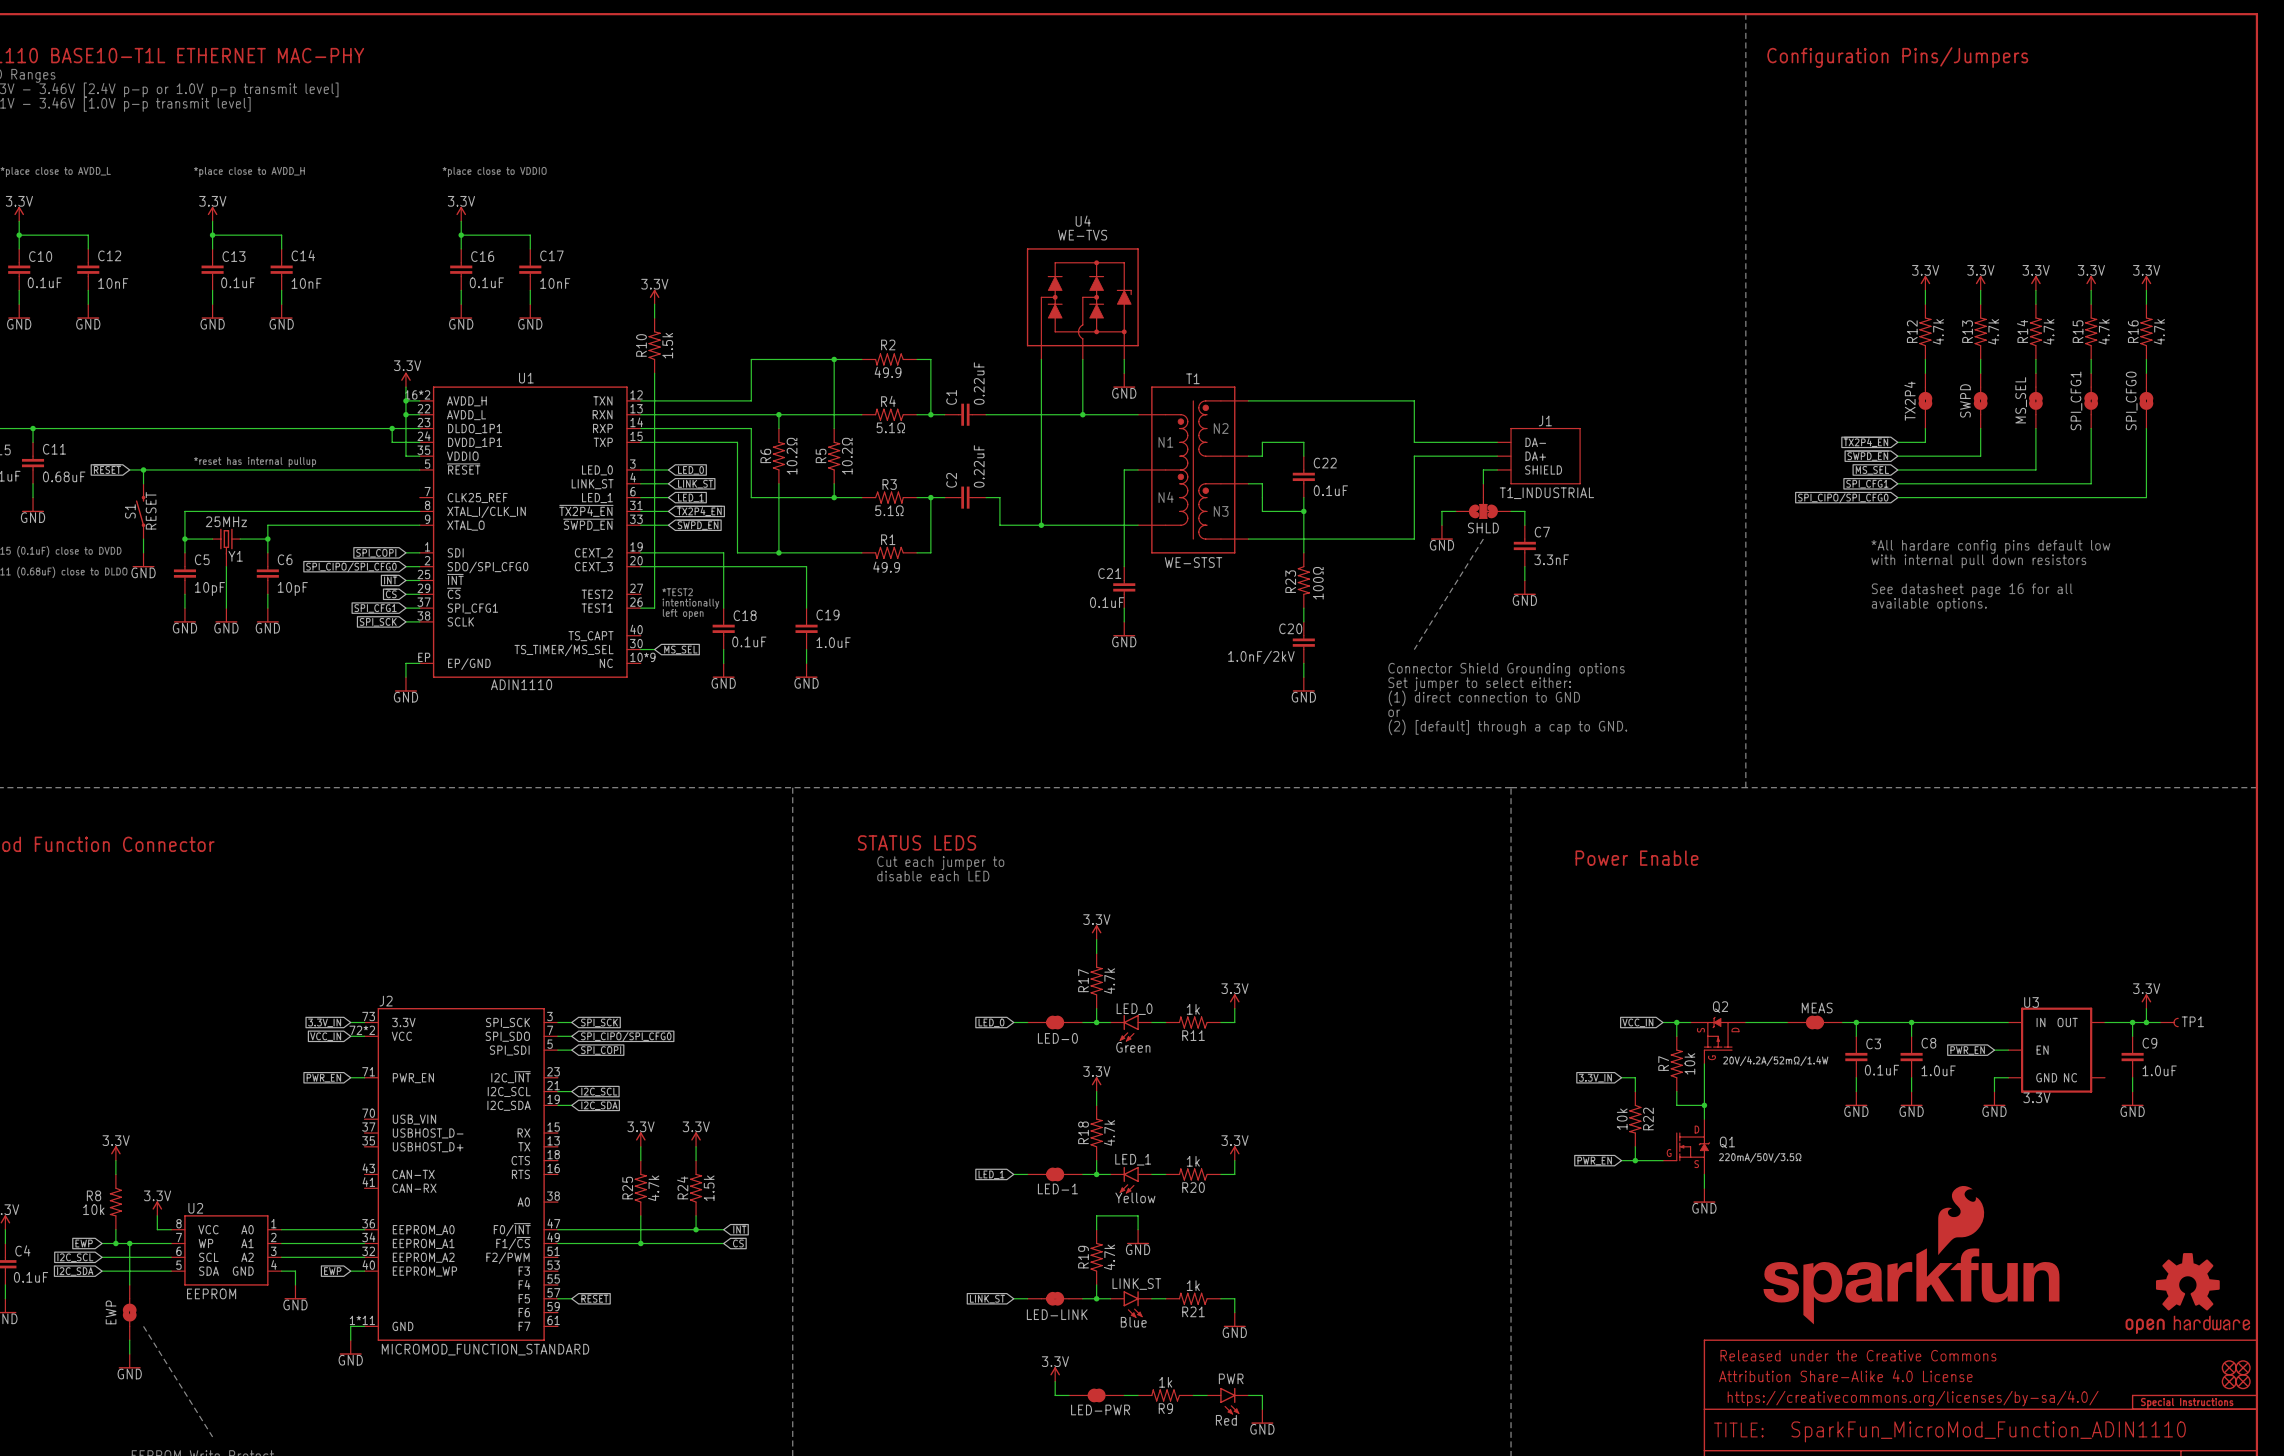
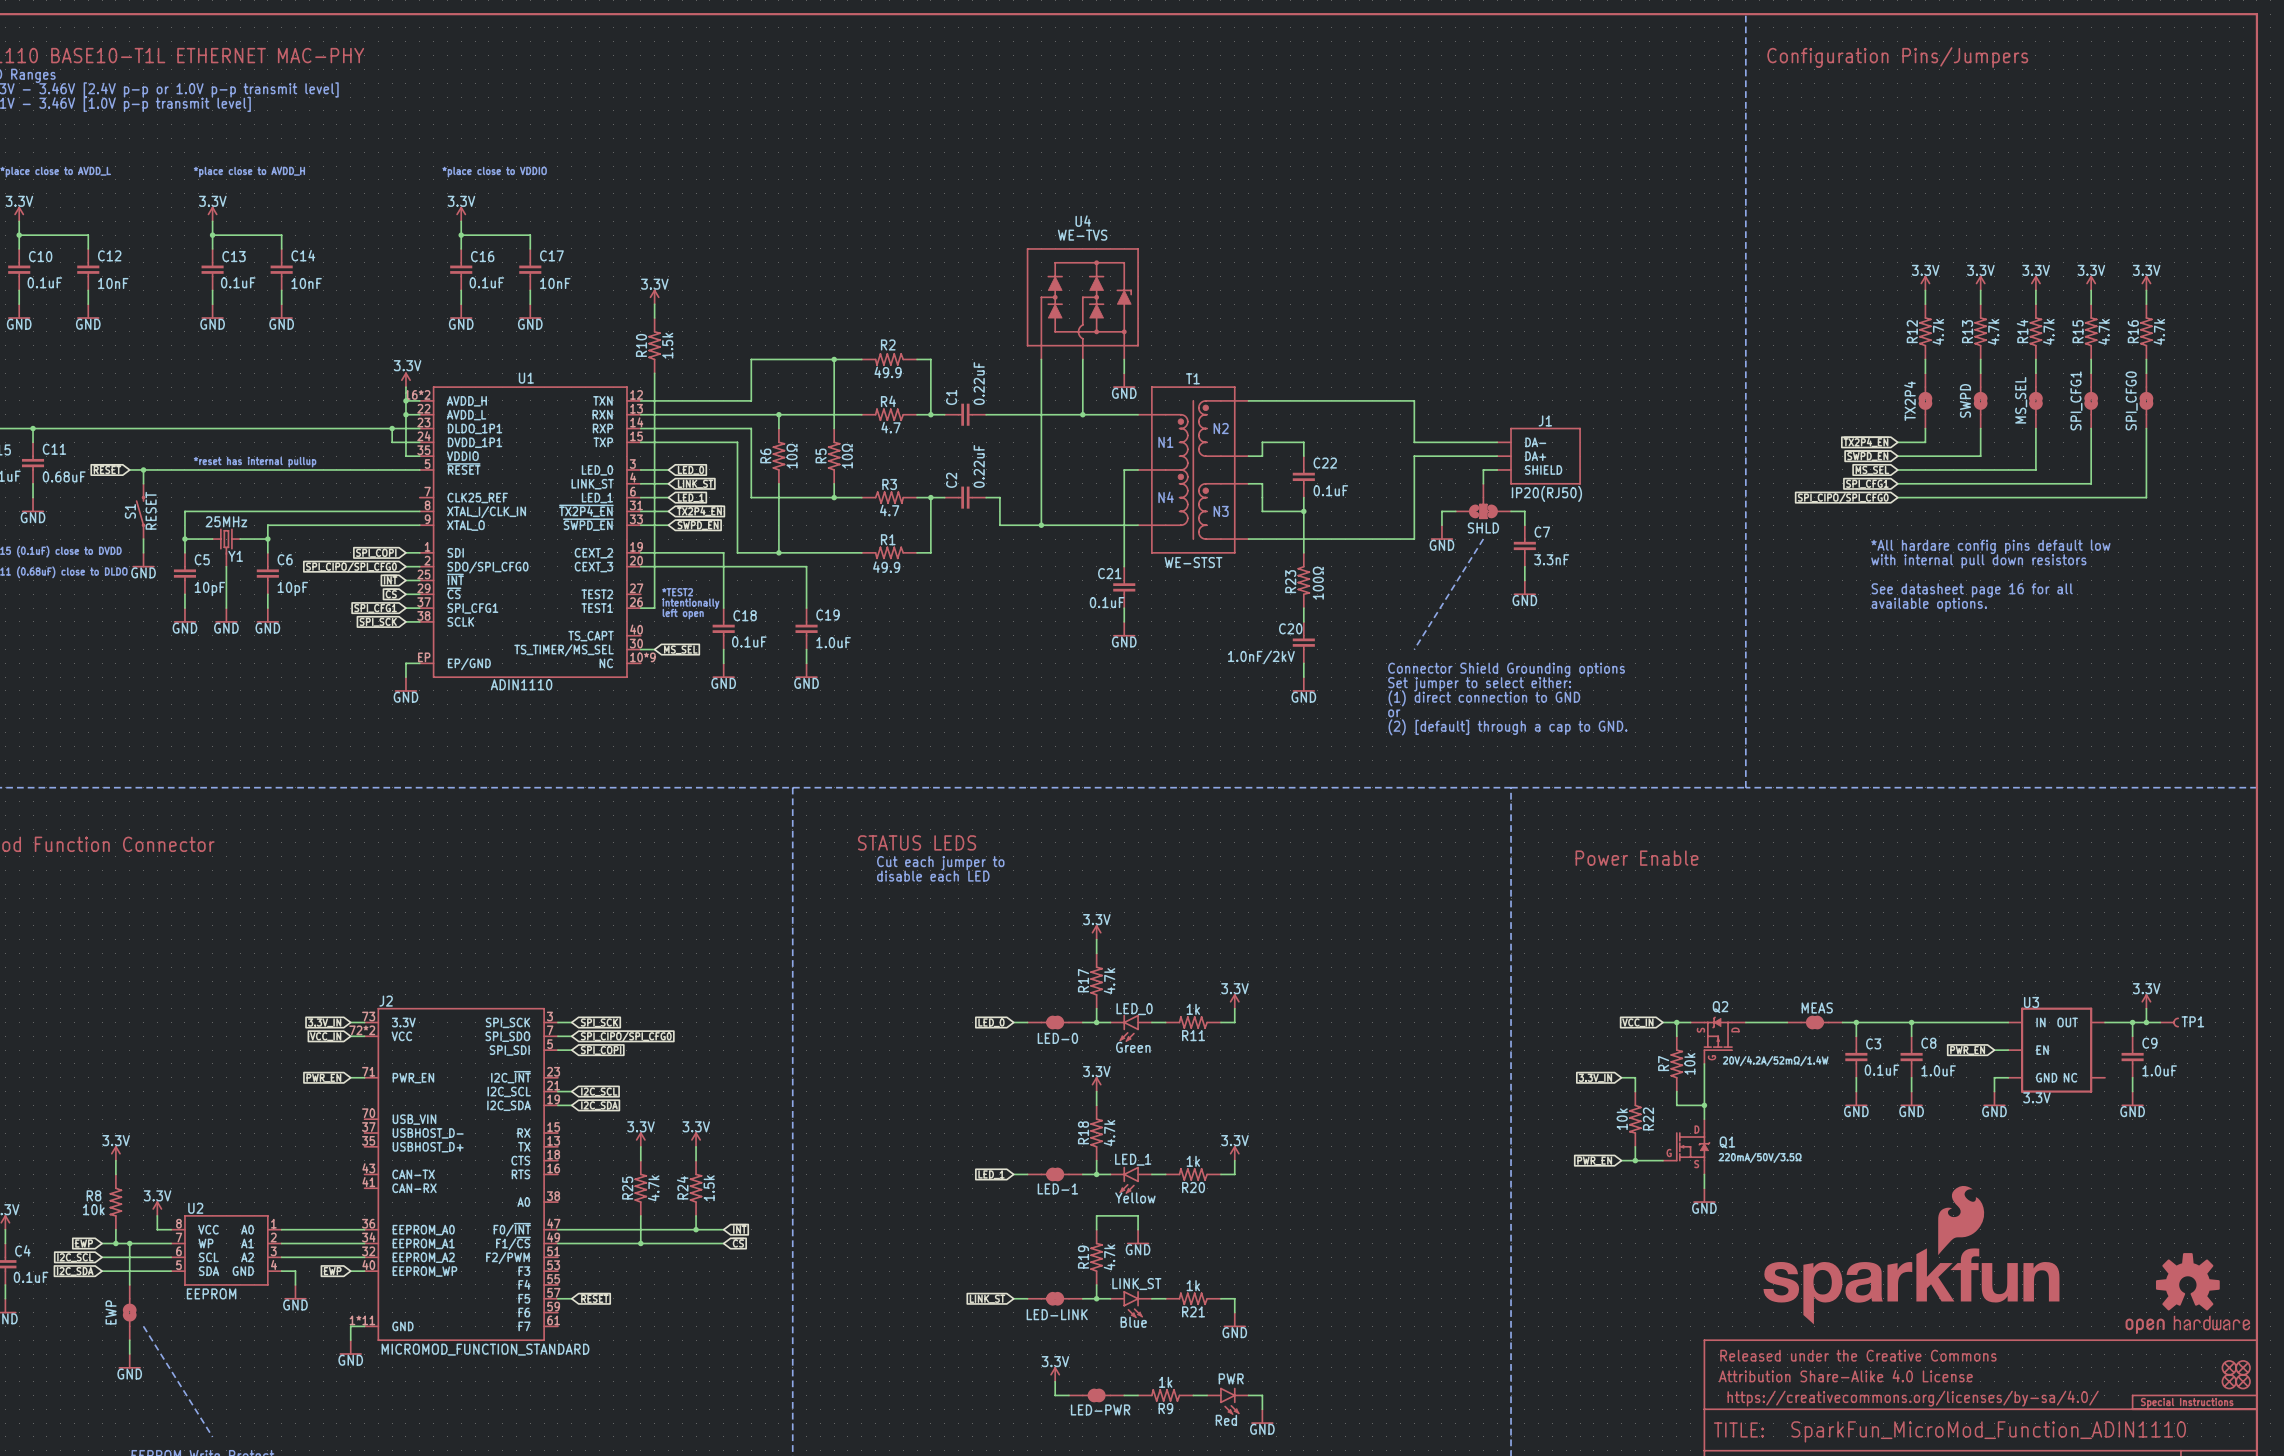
R4 value: 5.1Ω (890, 427) -> 4.7 (891, 427)
R6 value: 10.2Ω (792, 456) -> 10Ω (792, 456)
R5 value: 10.2Ω (847, 456) -> 10Ω (847, 456)
J1 value: T1_INDUSTRIAL (1546, 493) -> IP20(RJ50) (1546, 493)
R3 value: 5.1Ω (889, 510) -> 4.7 (889, 510)

